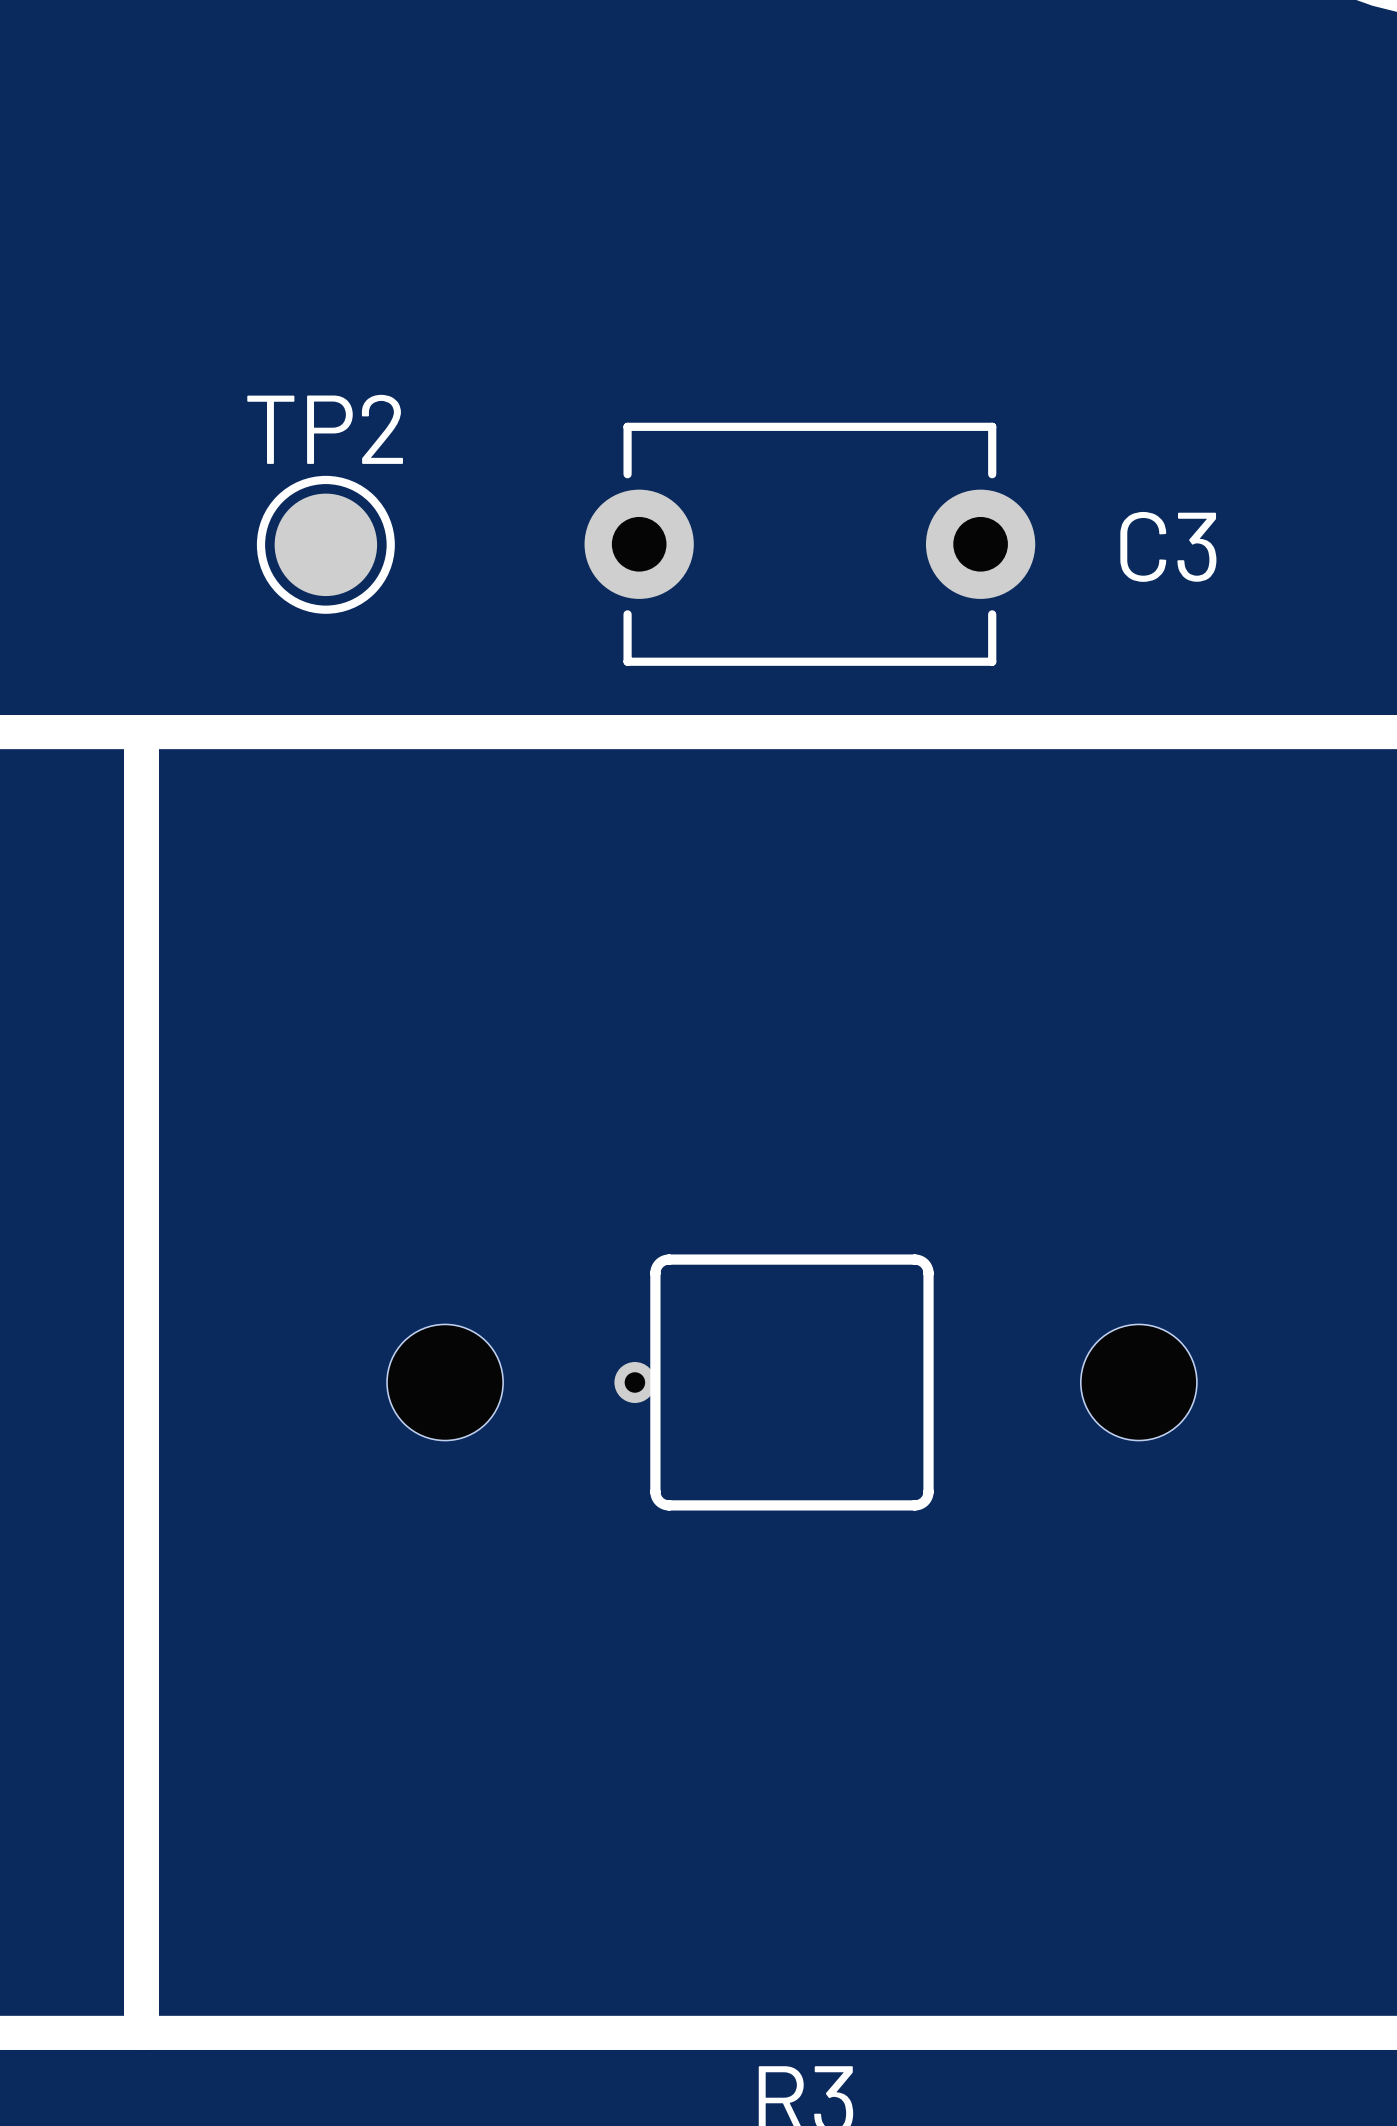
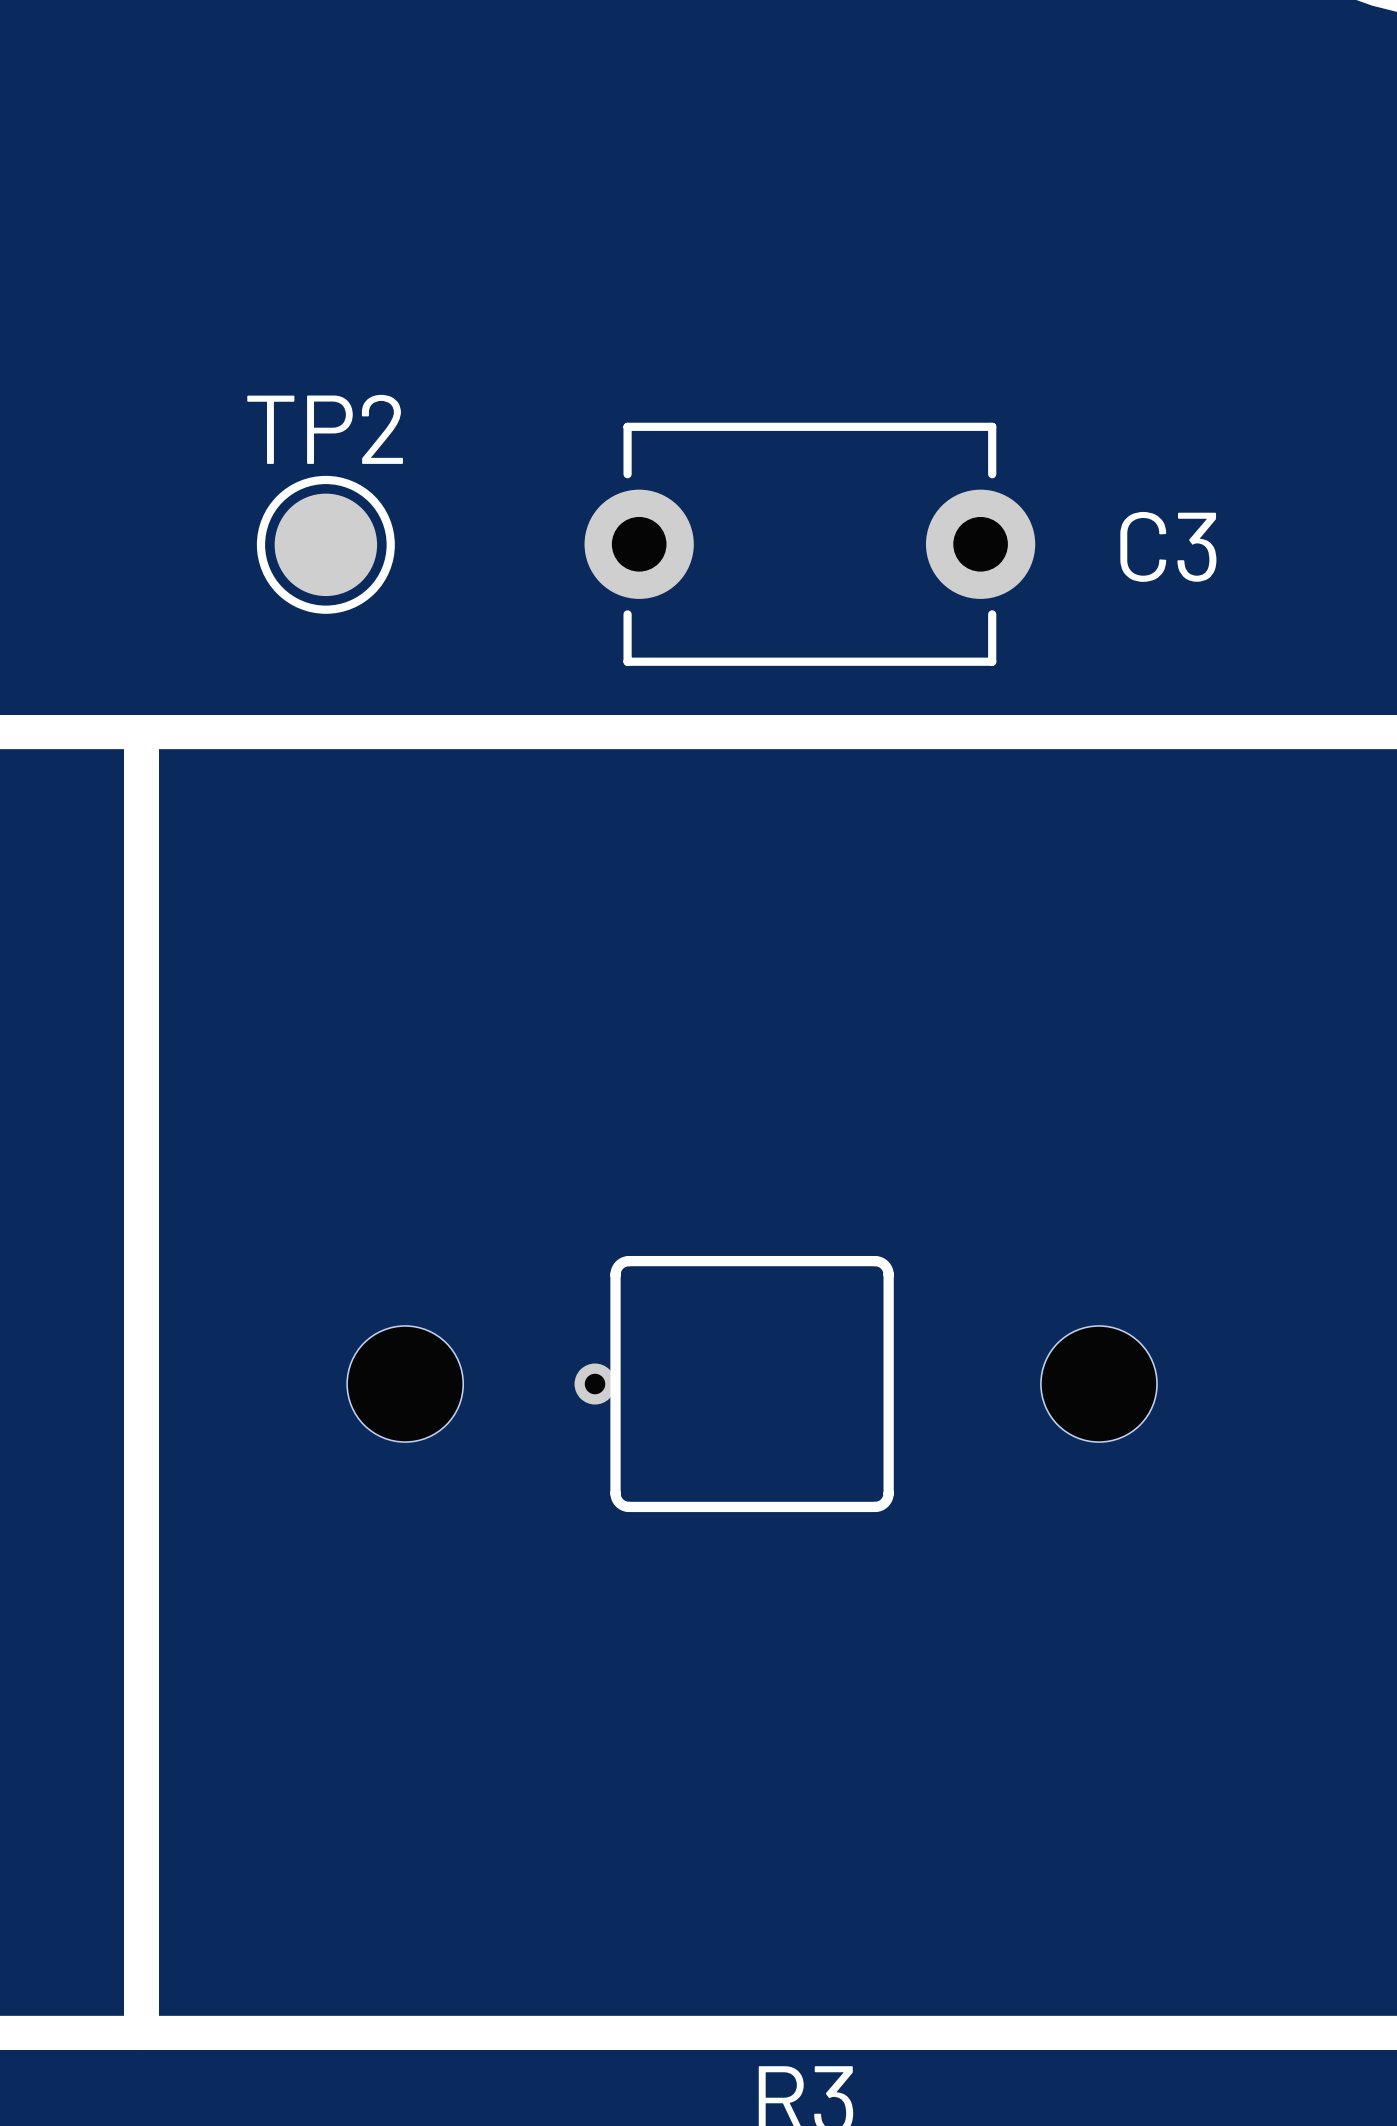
part position: (791, 1382) -> (752, 1384)

